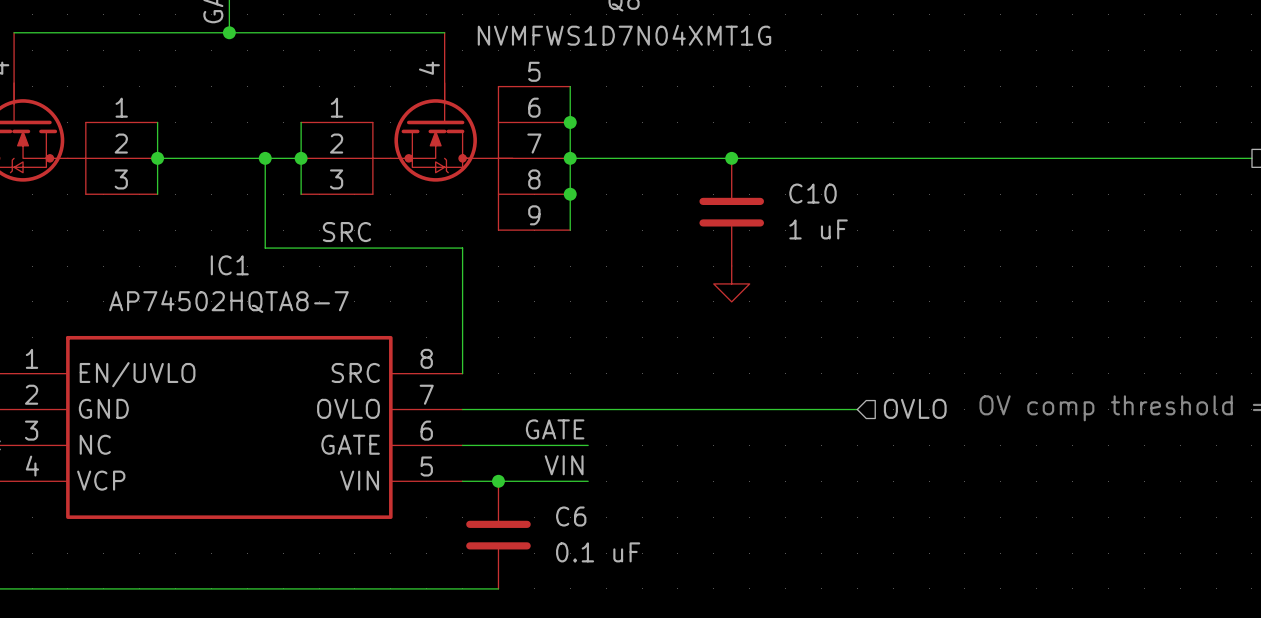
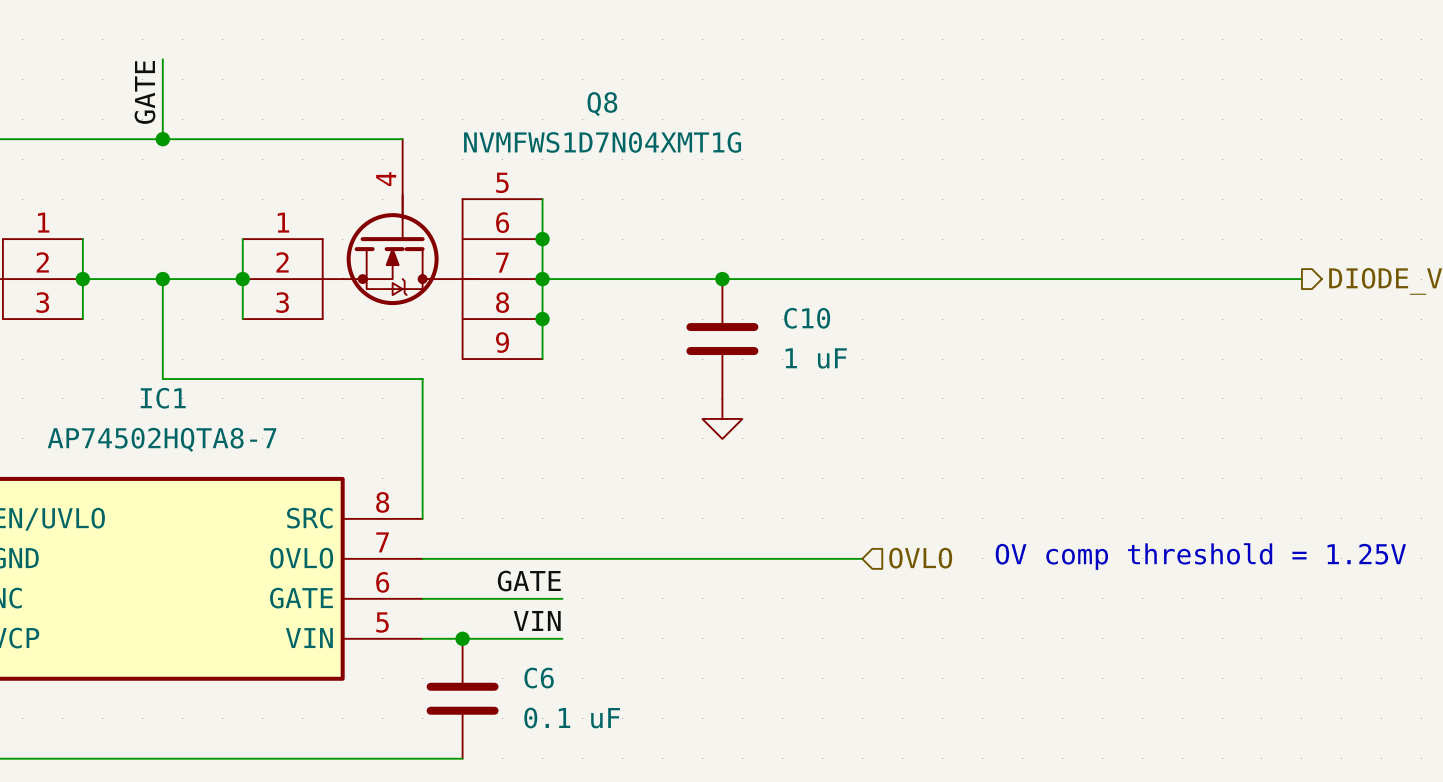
wire: (265, 158) (265, 248) -> (162, 279) (162, 379) (202, 379)
junction position: (265, 158) -> (162, 279)
label: SRC (346, 232) -> none

